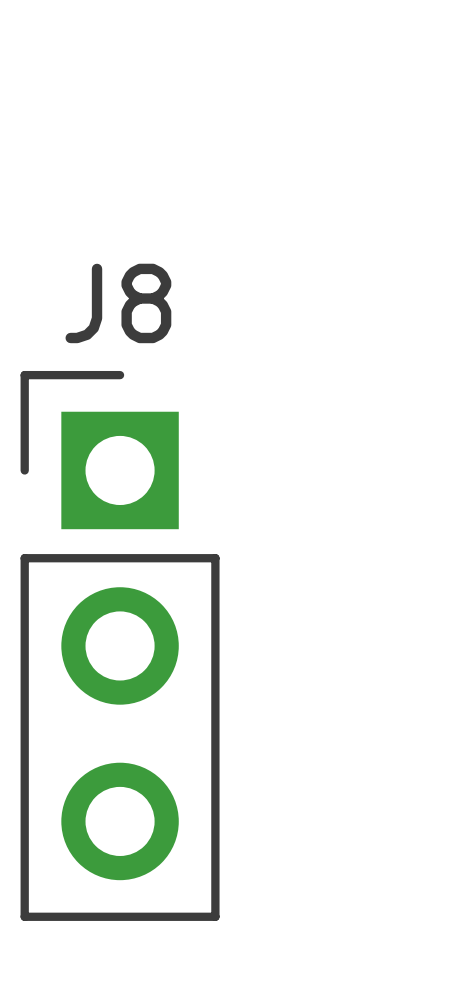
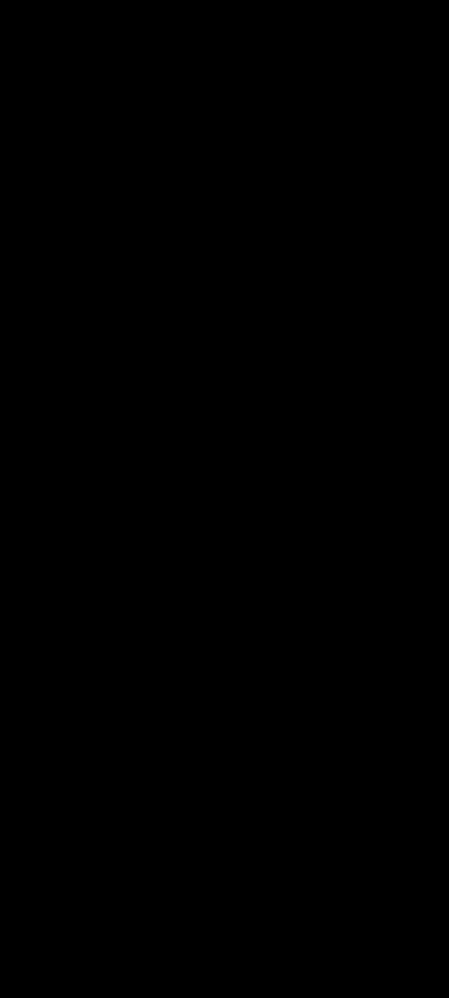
J8: (120, 645) -> none

